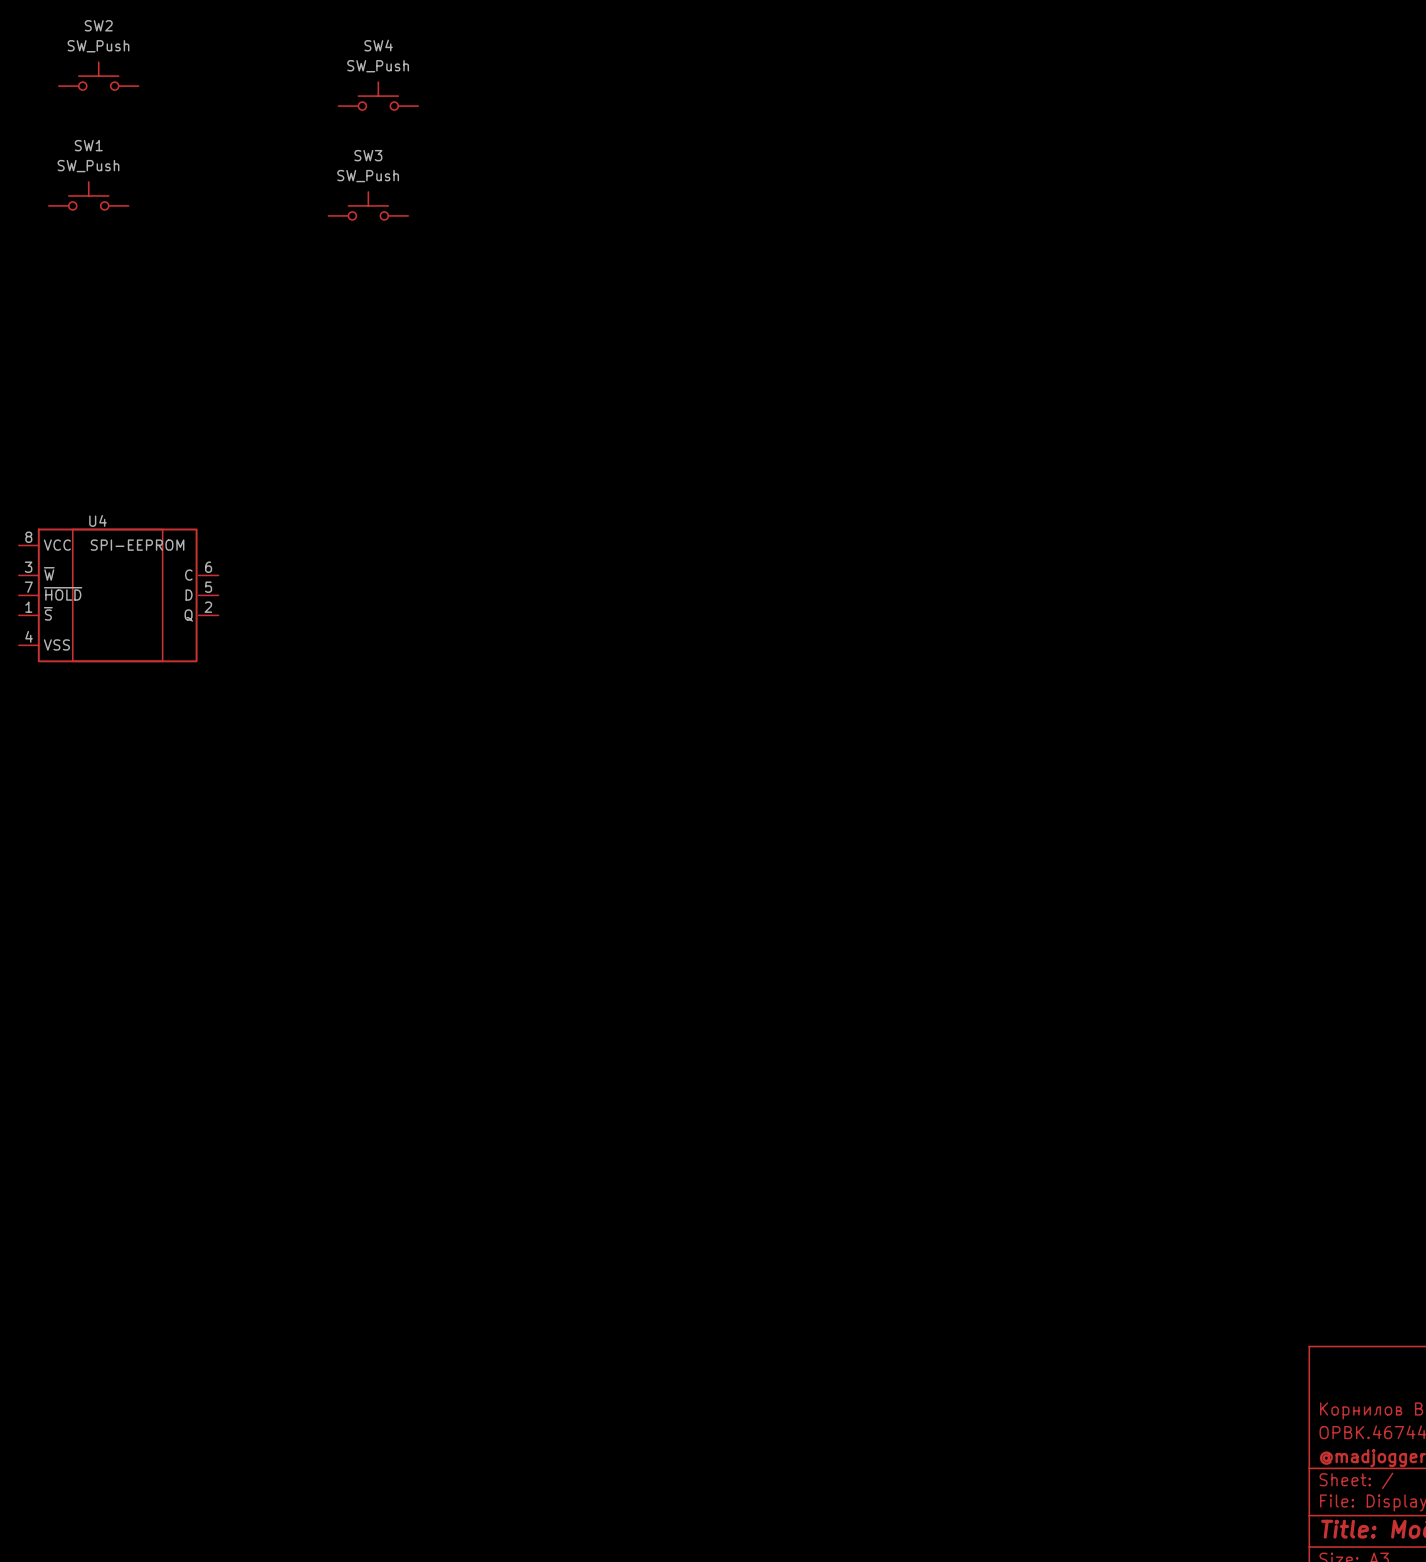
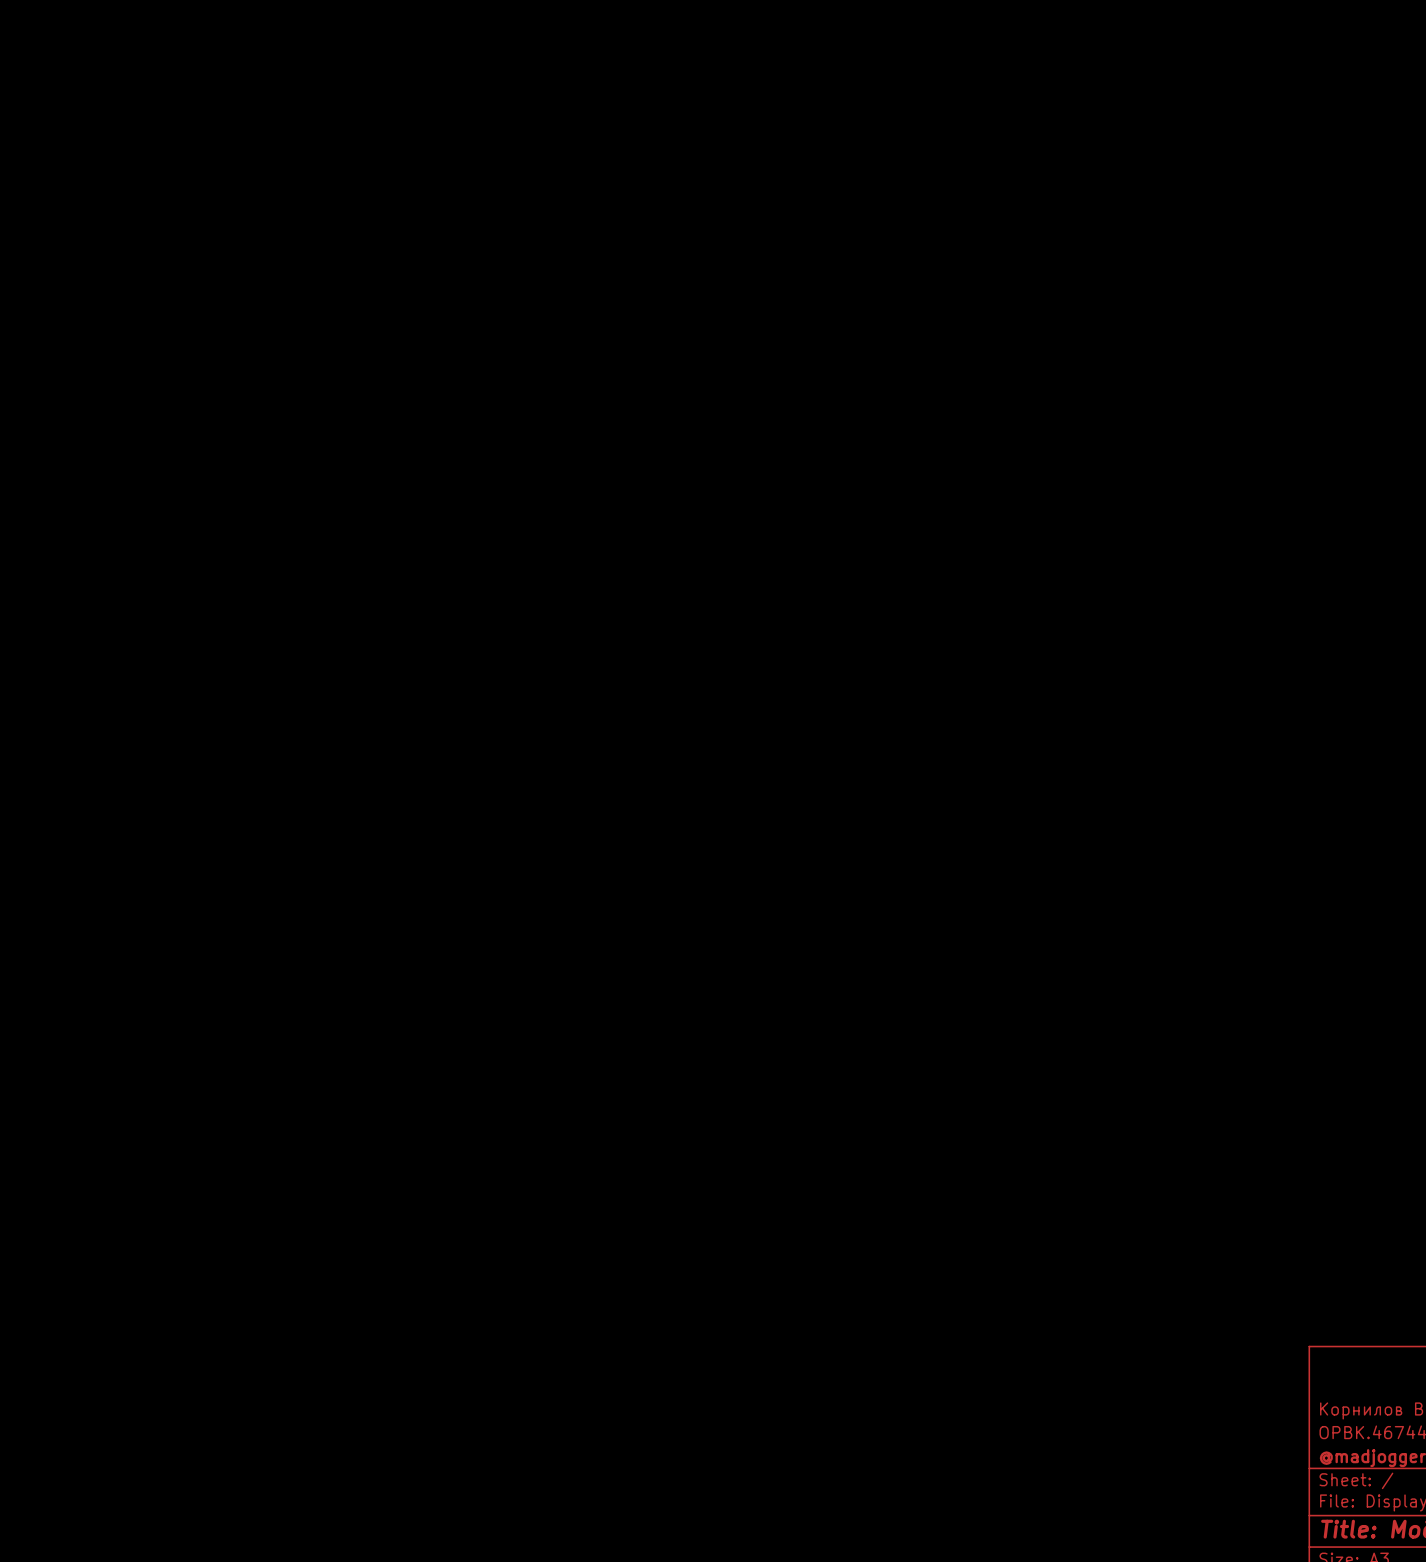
SW2: SW_Push (98, 76) -> none
SW4: SW_Push (378, 96) -> none
SW1: SW_Push (88, 195) -> none
SW3: SW_Push (368, 205) -> none
U4: SPI-EEPROM (118, 595) -> none

